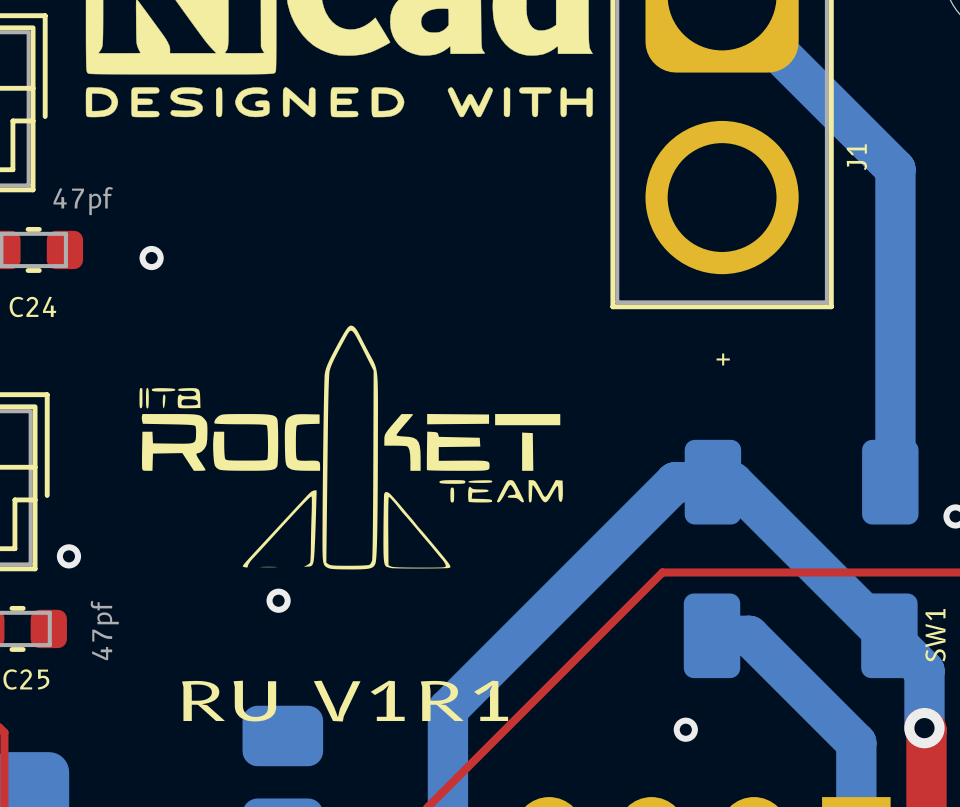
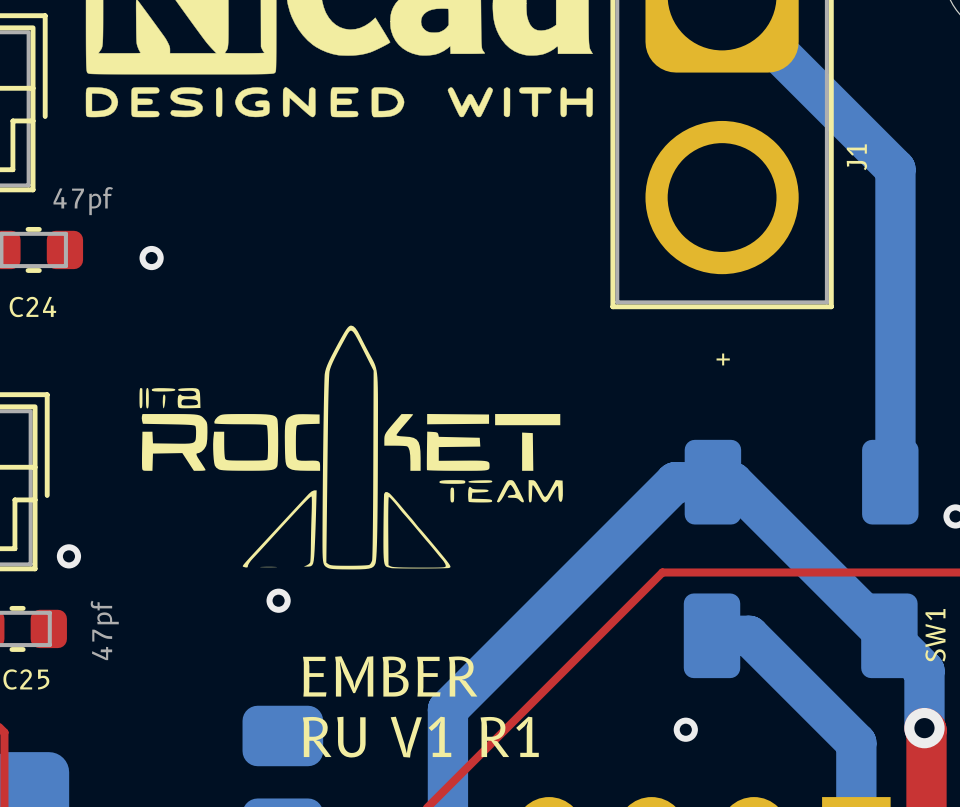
text: none -> EMBER (390, 676)
text: RU V1R1 (345, 701) -> RU V1 R1 (420, 737)

